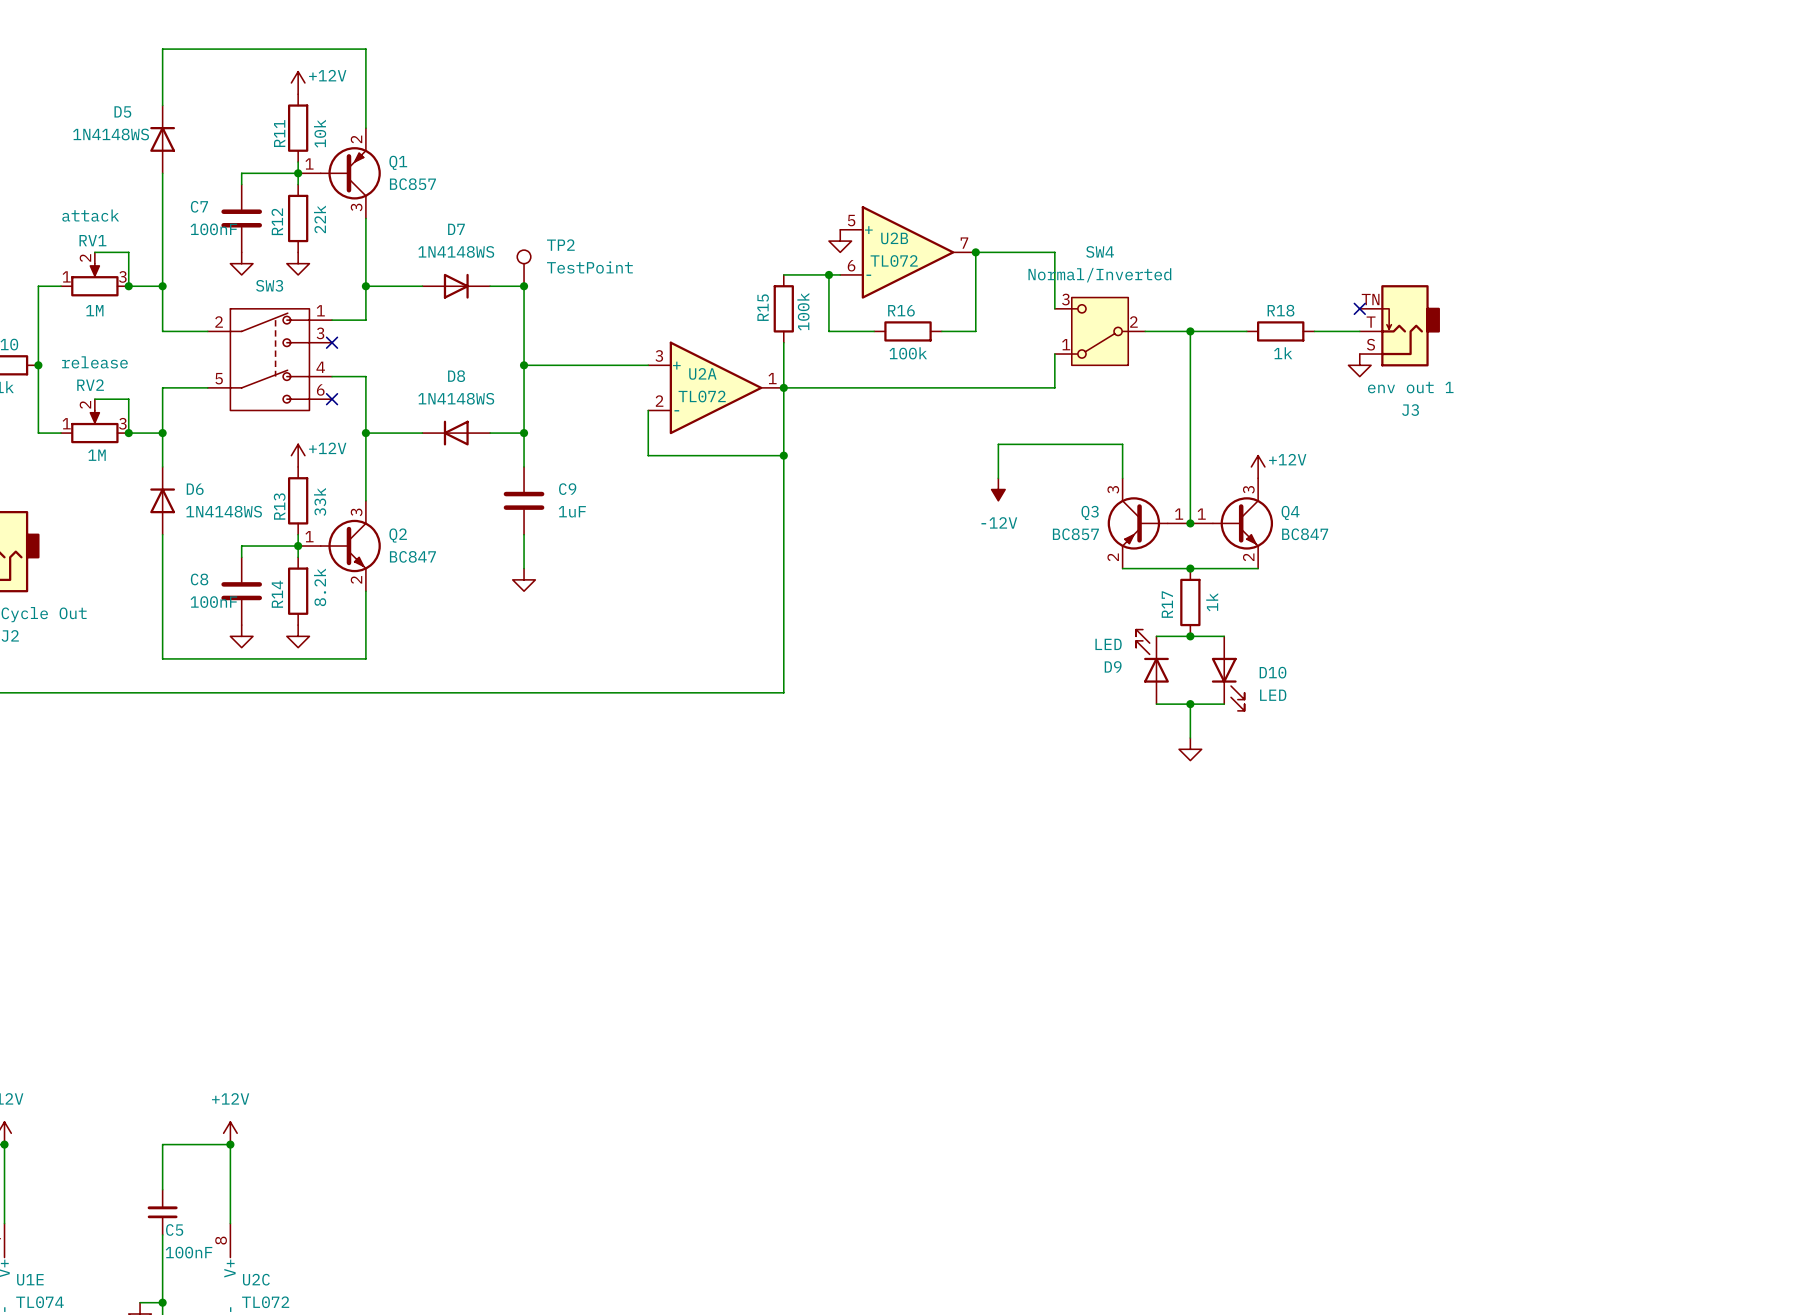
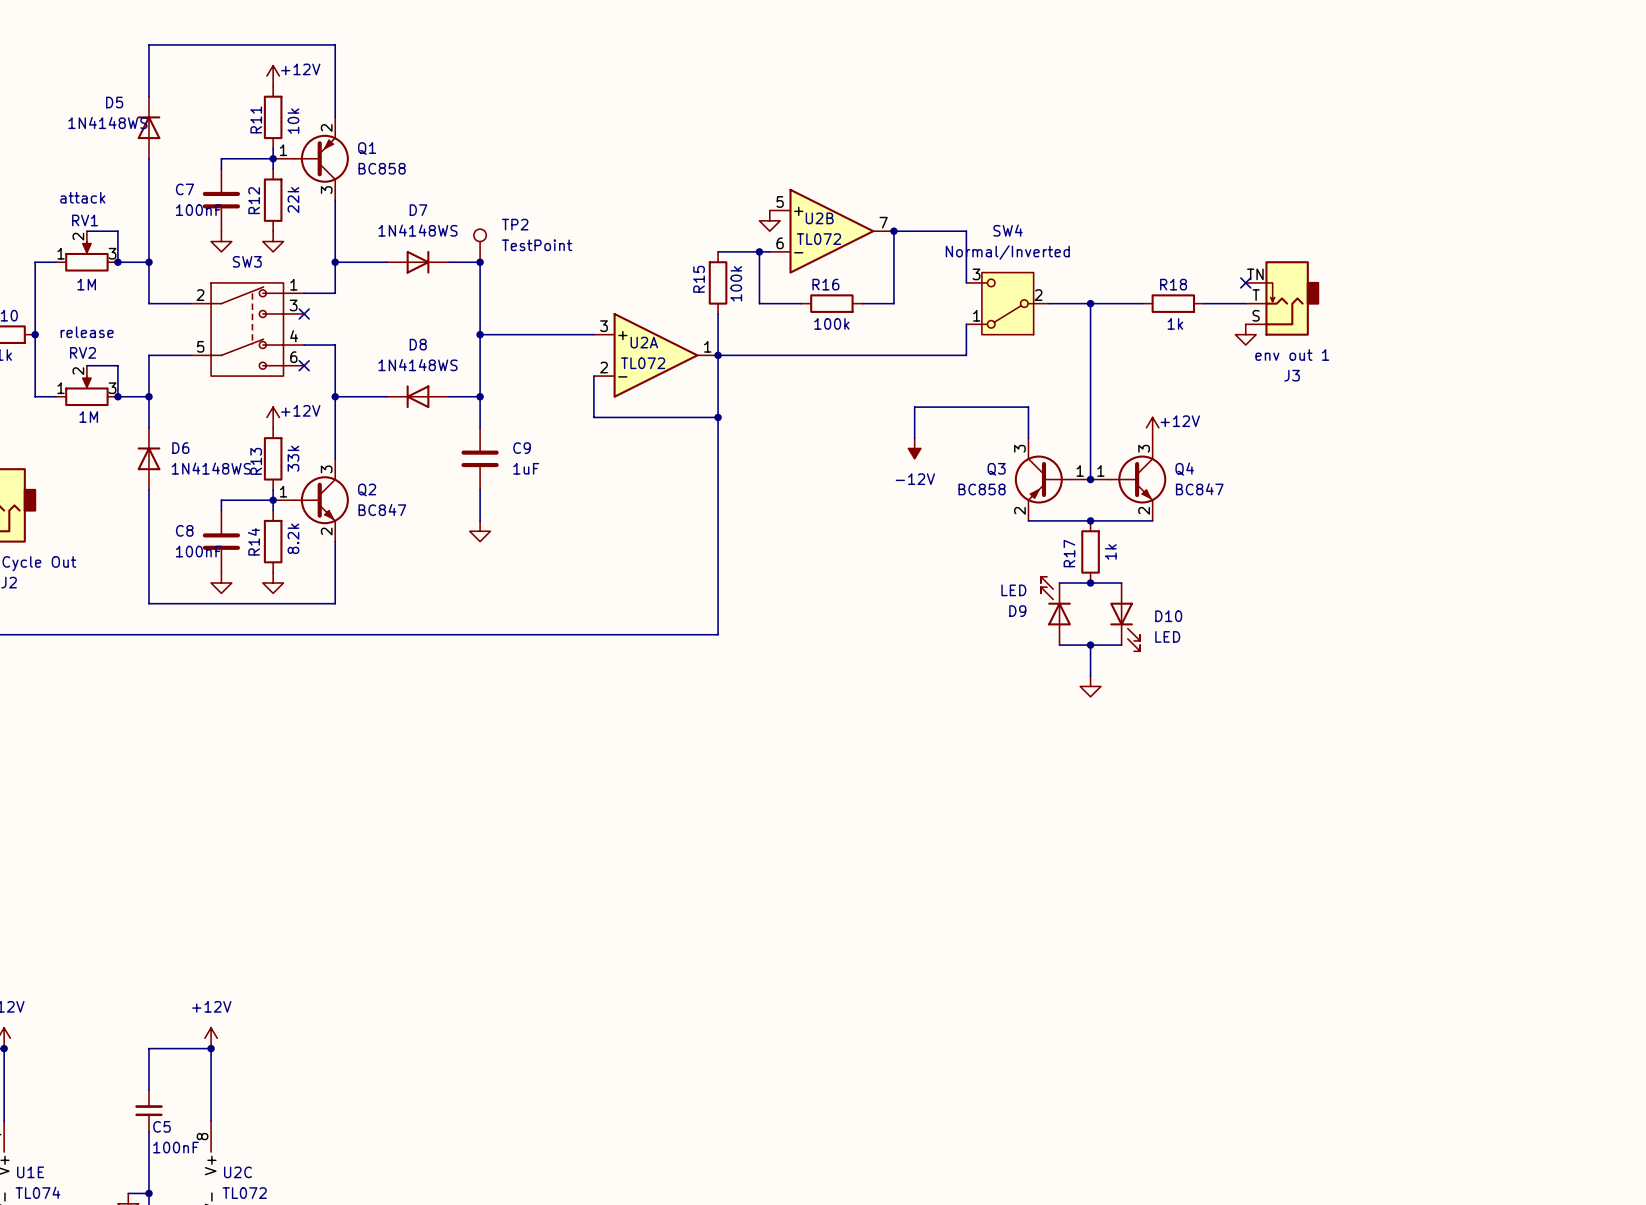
Q1 value: BC857 (412, 184) -> BC858 (382, 168)
Q3 value: BC857 (1075, 534) -> BC858 (982, 489)

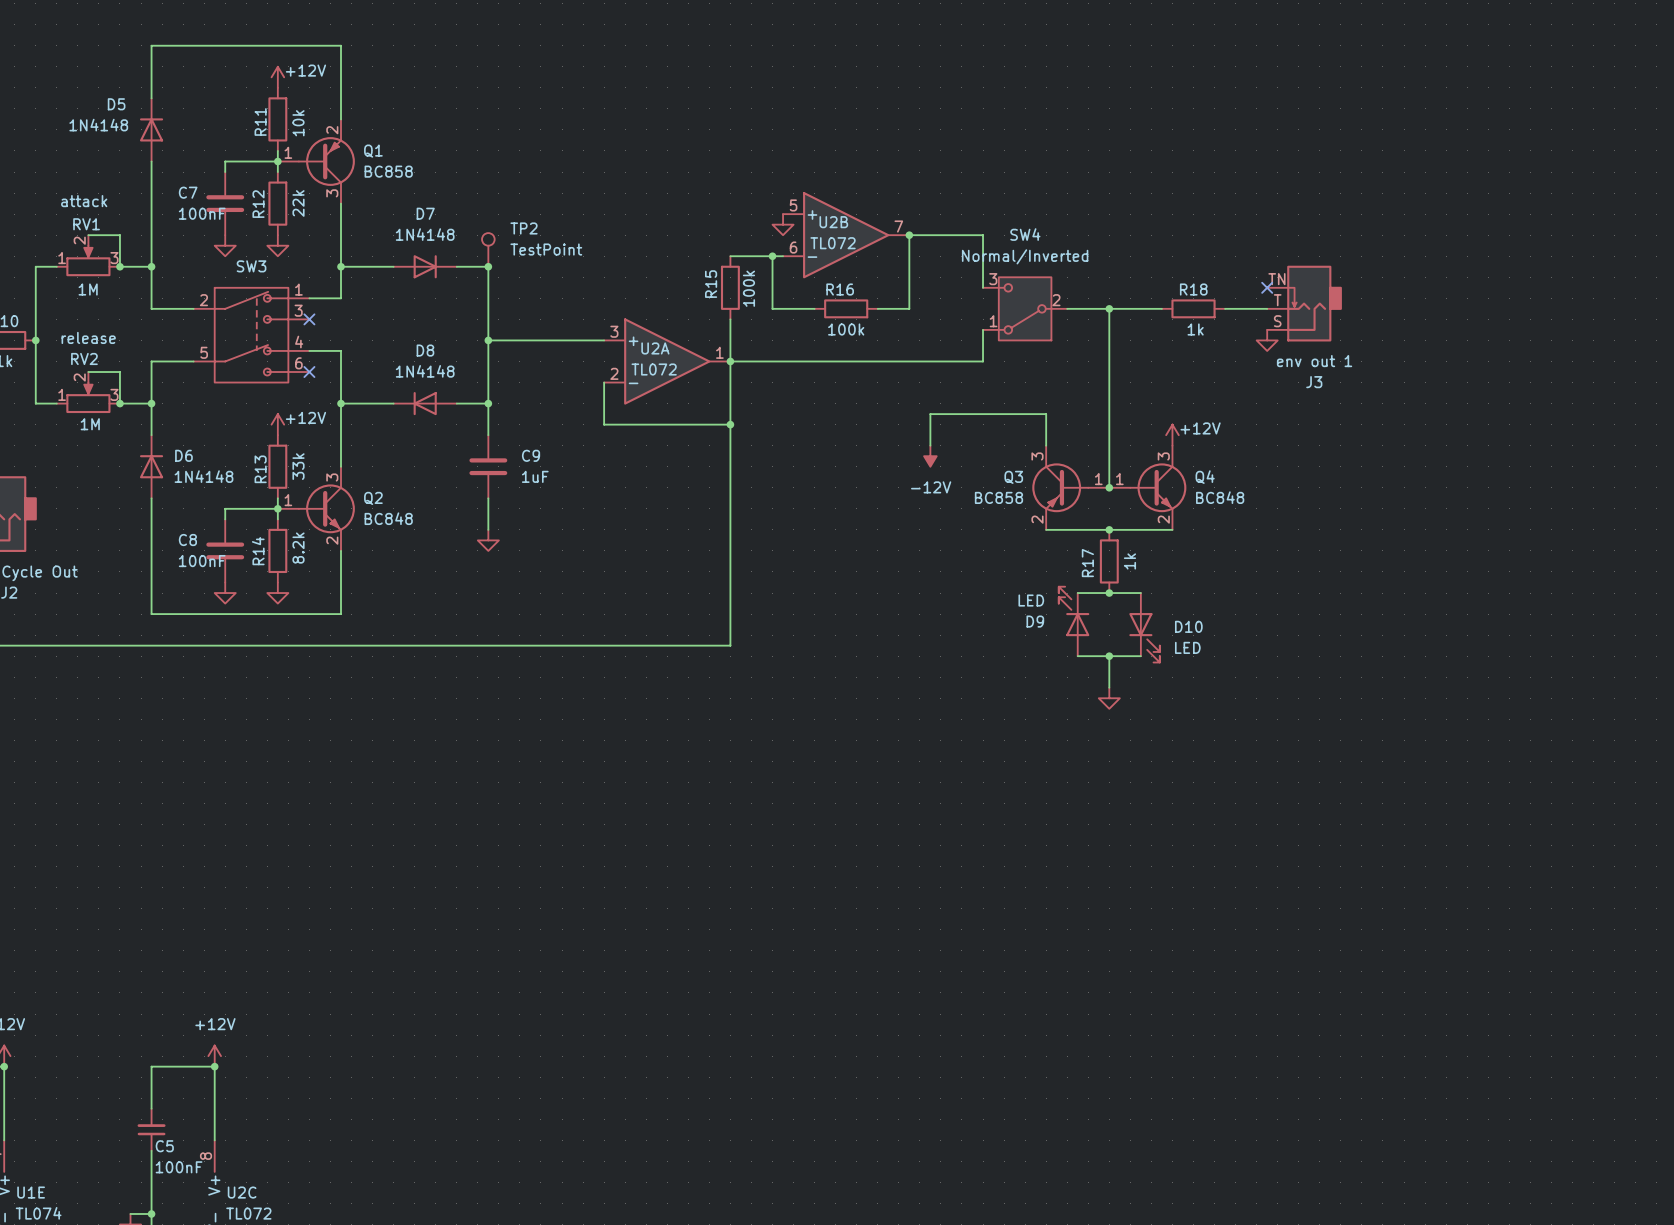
D5 value: 1N4148WS (107, 122) -> 1N4148 (98, 125)
D7 value: 1N4148WS (418, 230) -> 1N4148 (425, 234)
D8 value: 1N4148WS (418, 365) -> 1N4148 (425, 371)
D6 value: 1N4148WS (211, 468) -> 1N4148 (204, 476)
Q4 value: BC847 (1199, 489) -> BC848 (1220, 497)
Q2 value: BC847 (382, 509) -> BC848 (388, 518)

